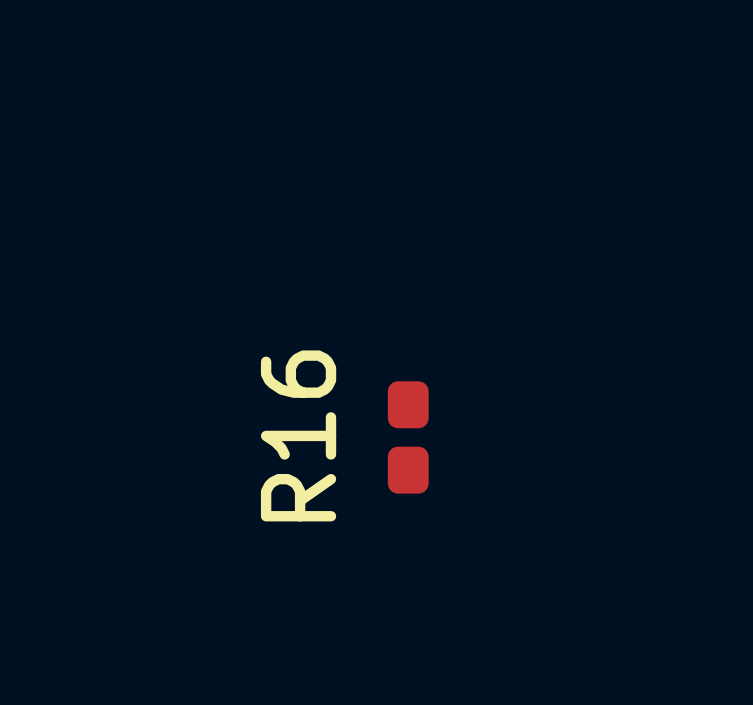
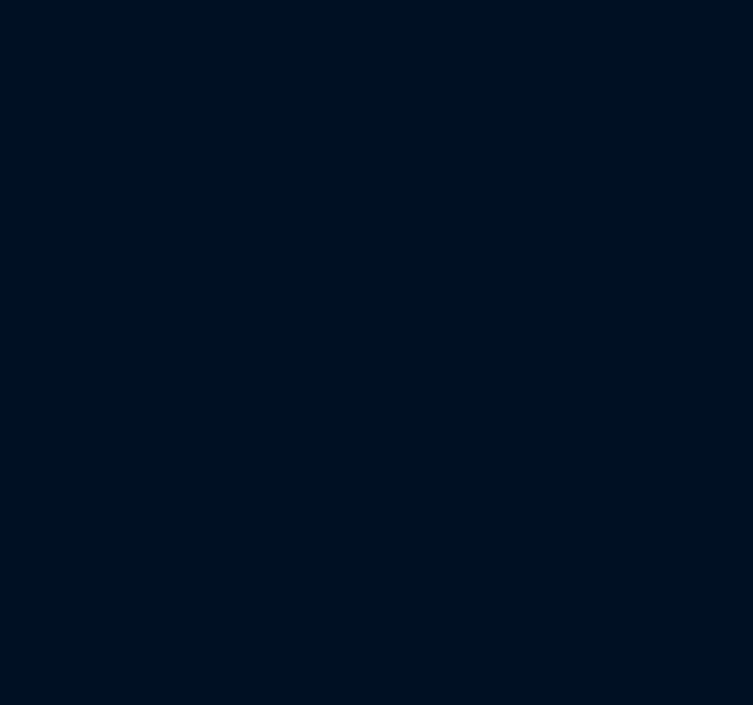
R16: (408, 437) -> none

